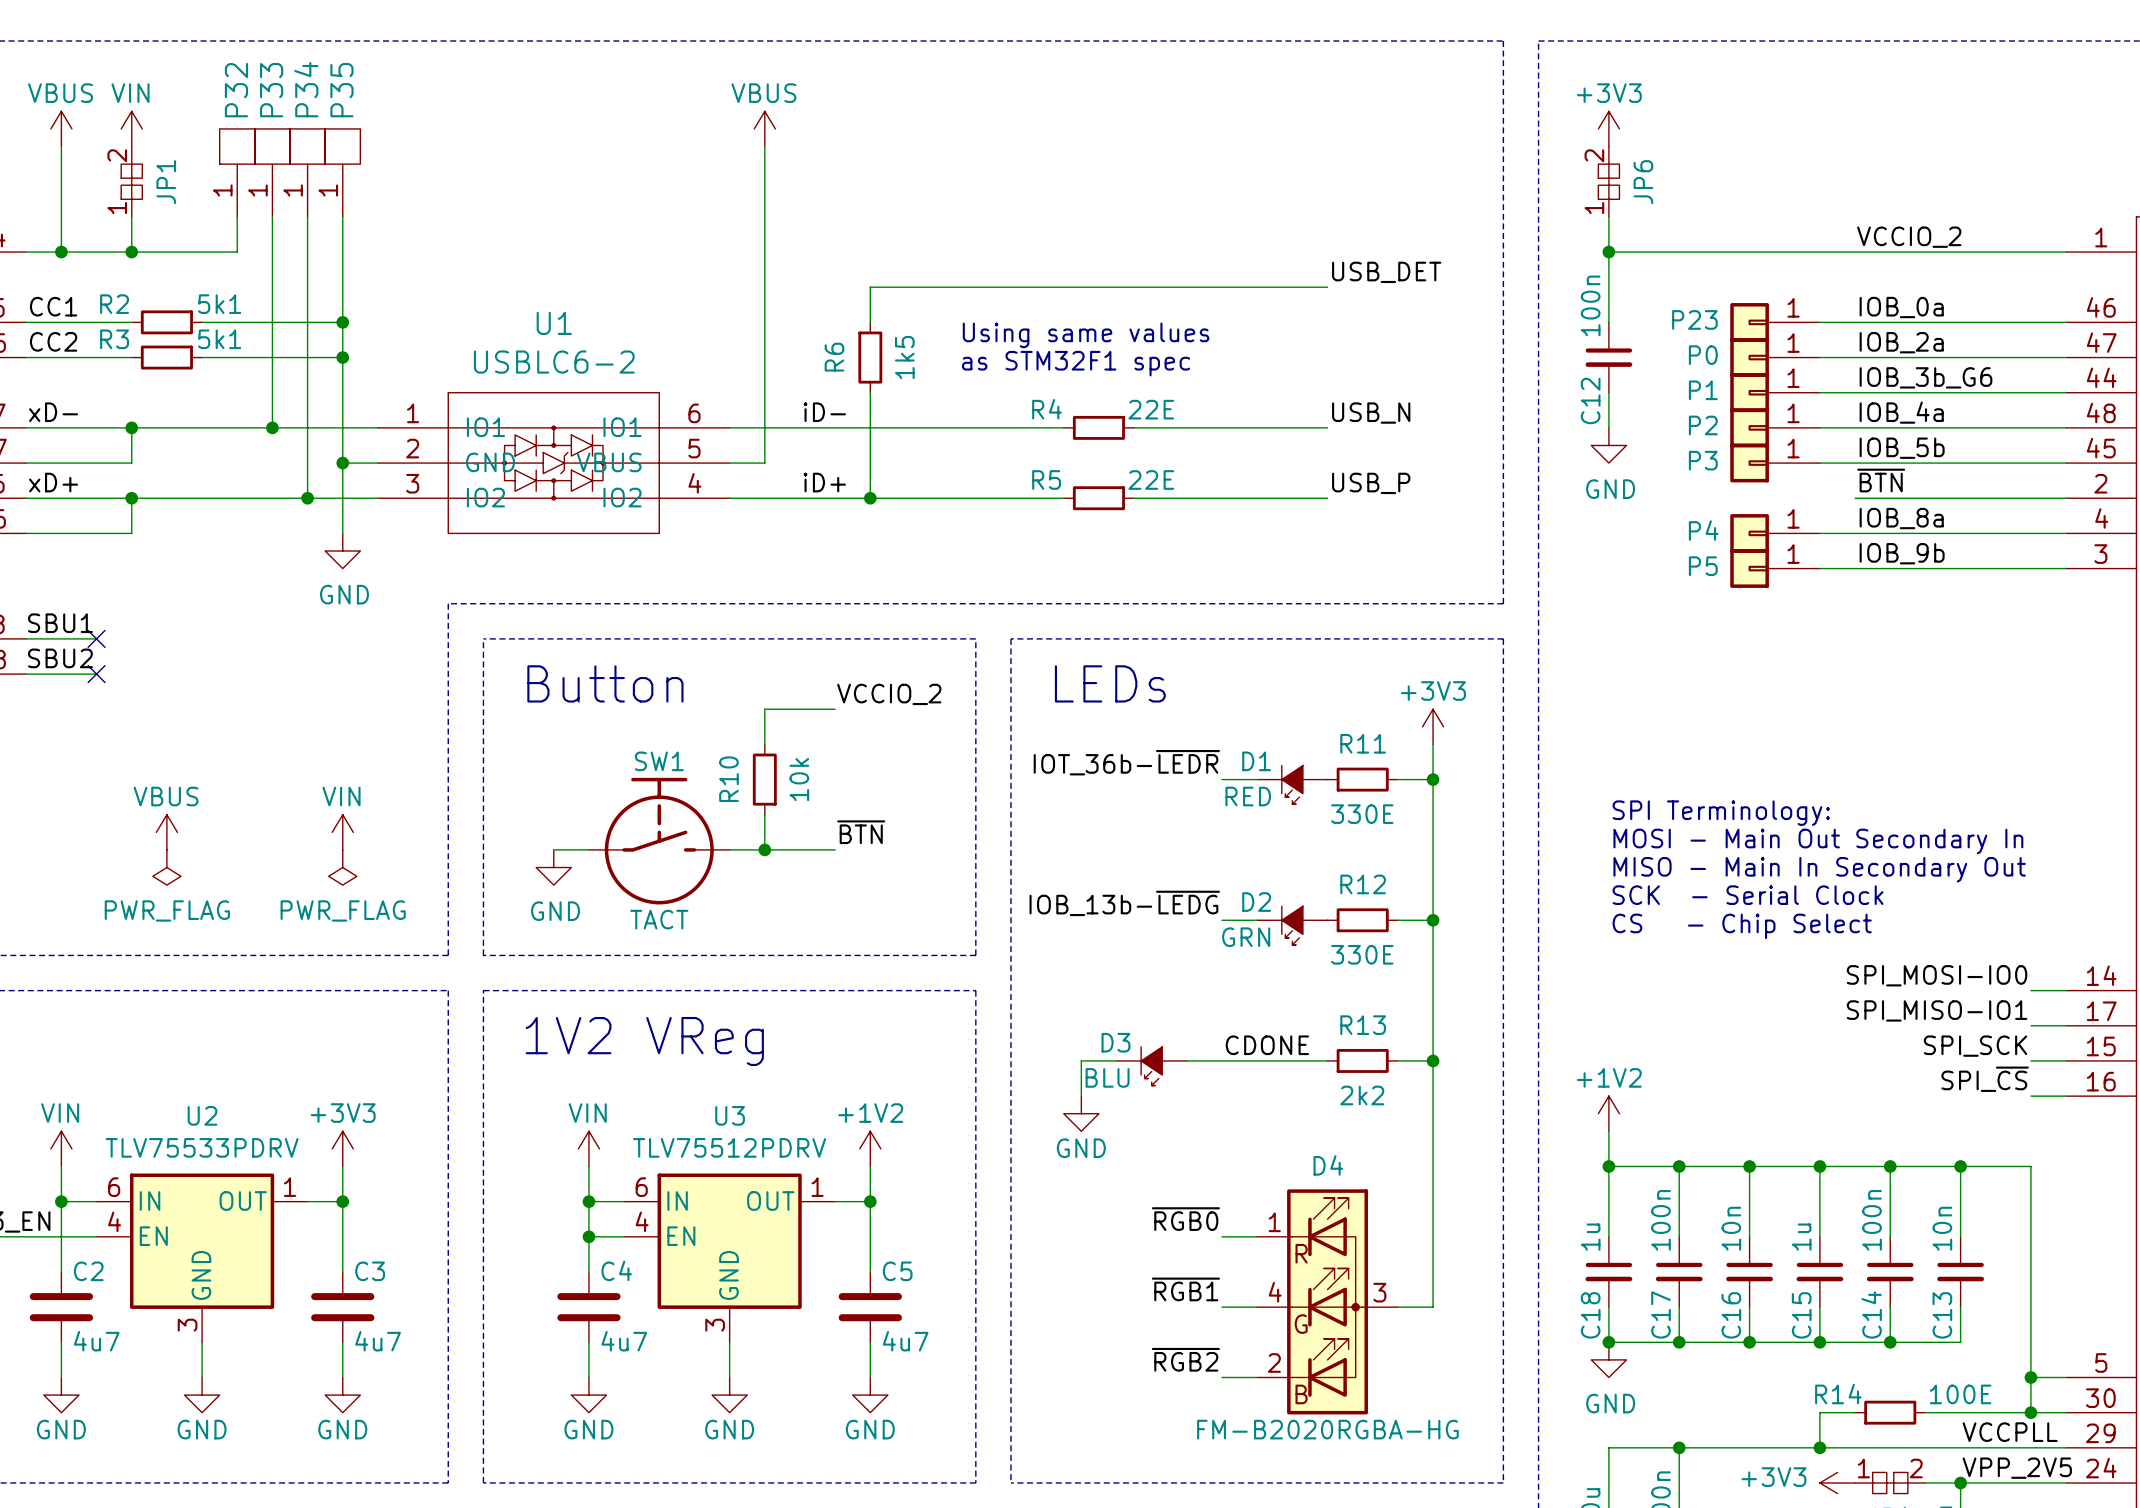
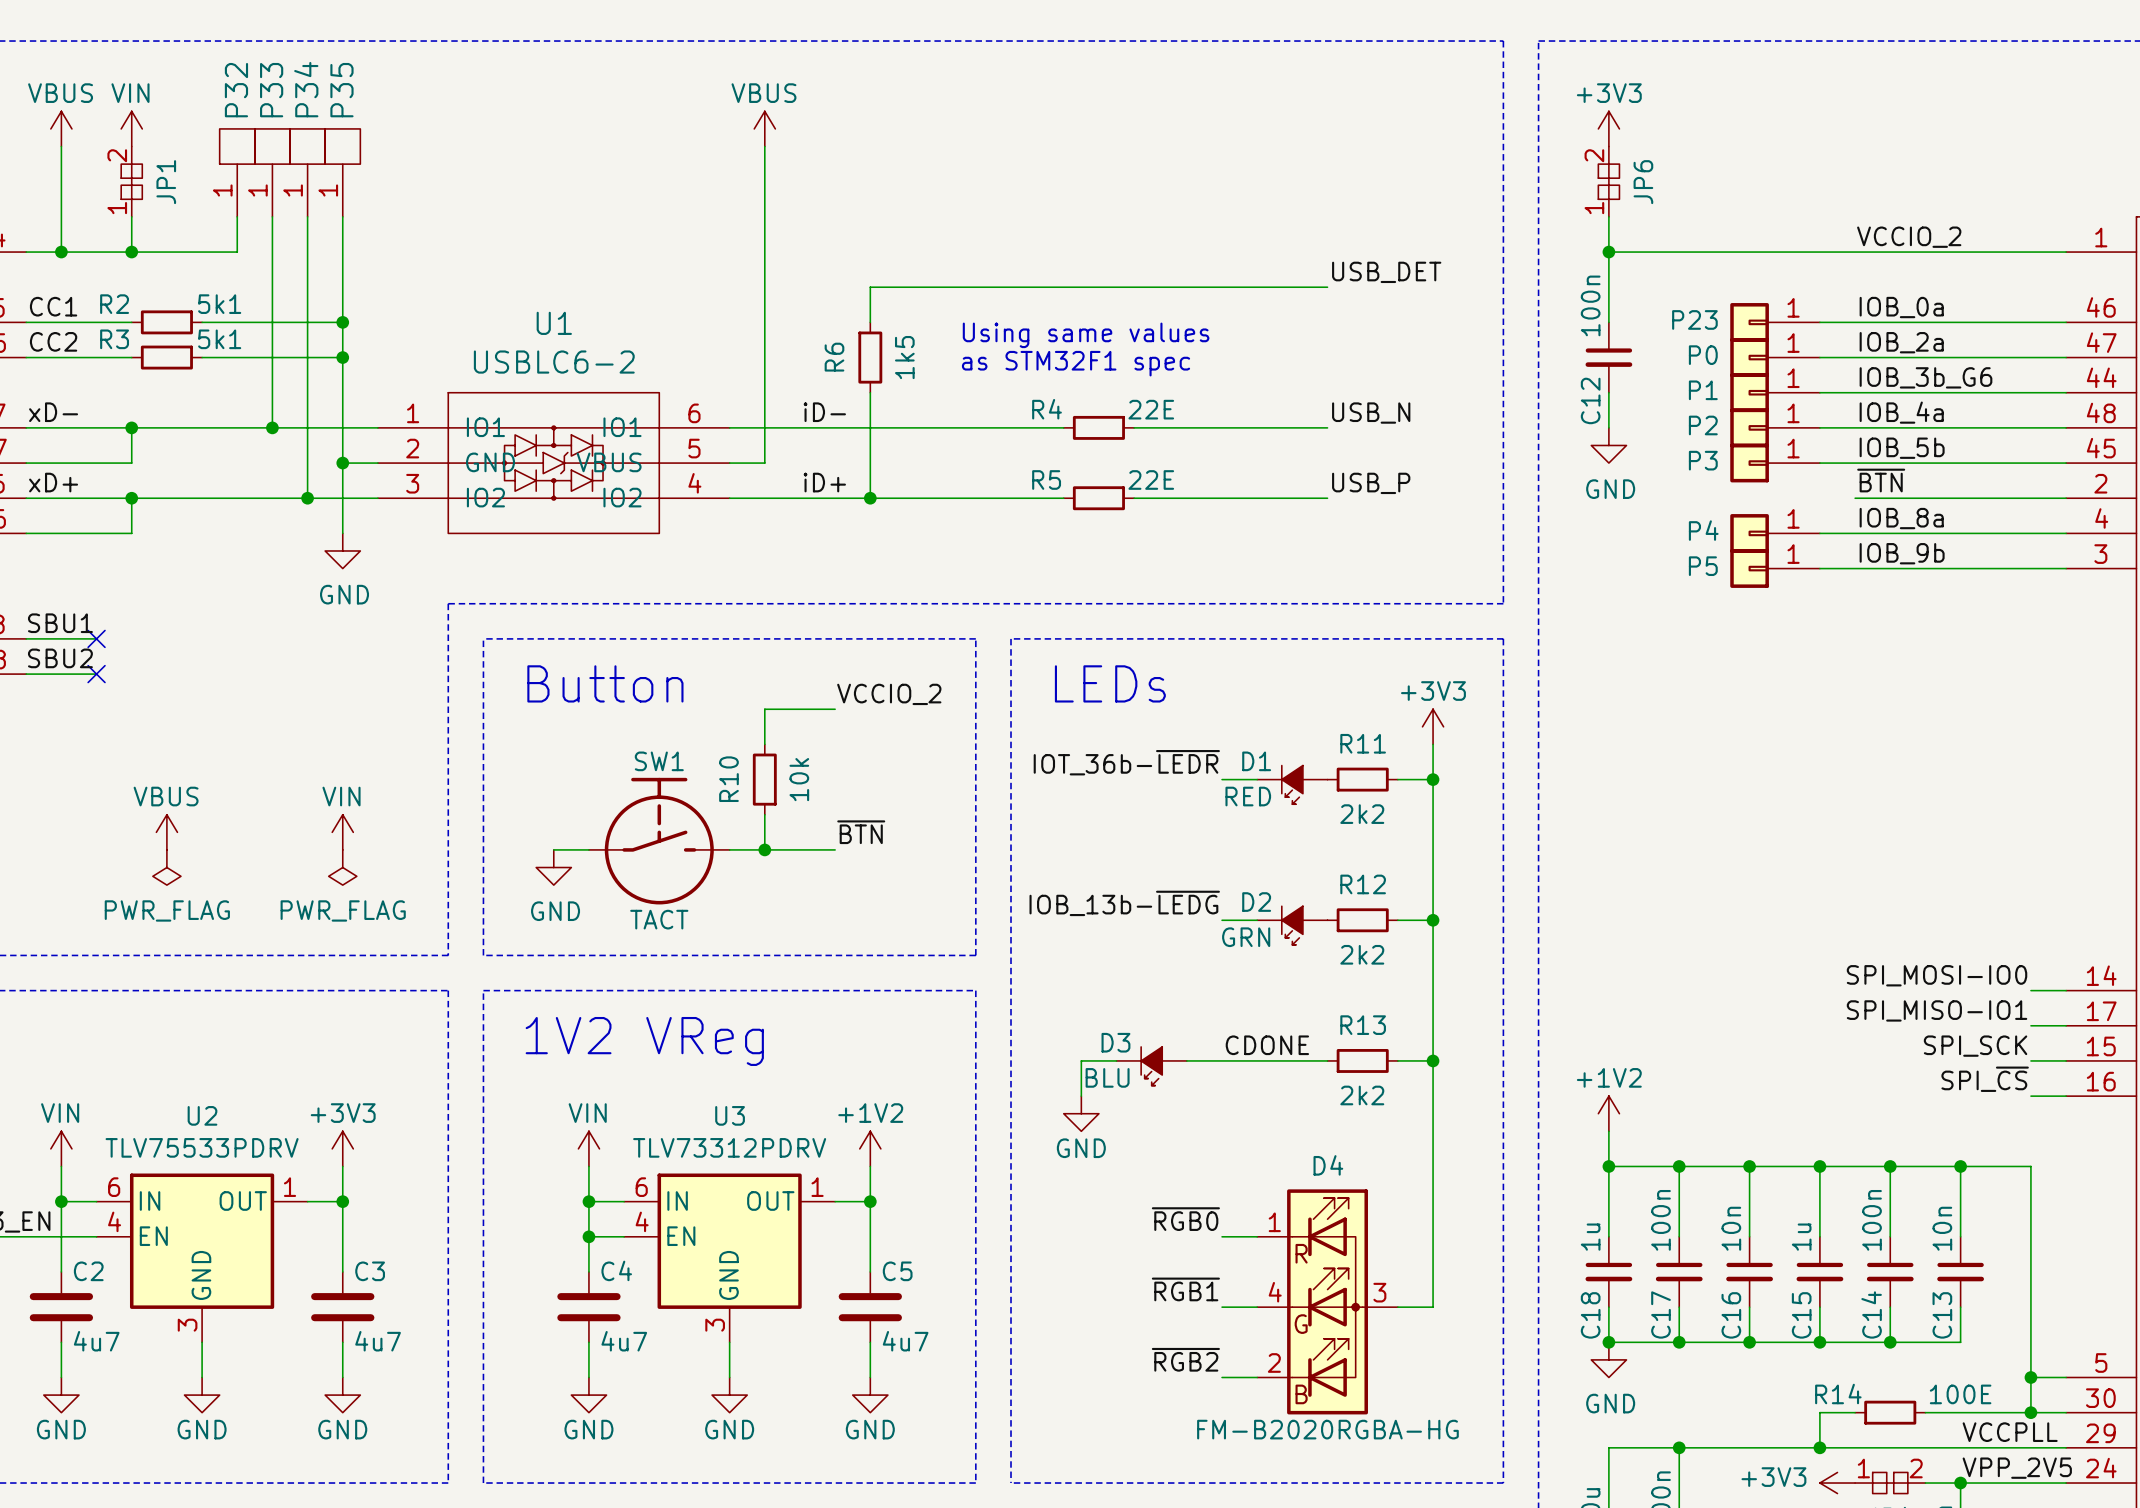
text: SPI Terminology: (1721, 813) -> none
R11 value: 330E (1362, 814) -> 2k2 (1362, 814)
text: MOSI - Main Out Secondary In (1818, 841) -> none
text: MISO - Main In Secondary Out (1819, 869) -> none
text: SCK - Serial Clock (1748, 895) -> none
text: CS - Chip Select (1742, 926) -> none
R12 value: 330E (1362, 954) -> 2k2 (1362, 954)
U3 value: TLV75512PDRV (729, 1147) -> TLV73312PDRV (729, 1147)

